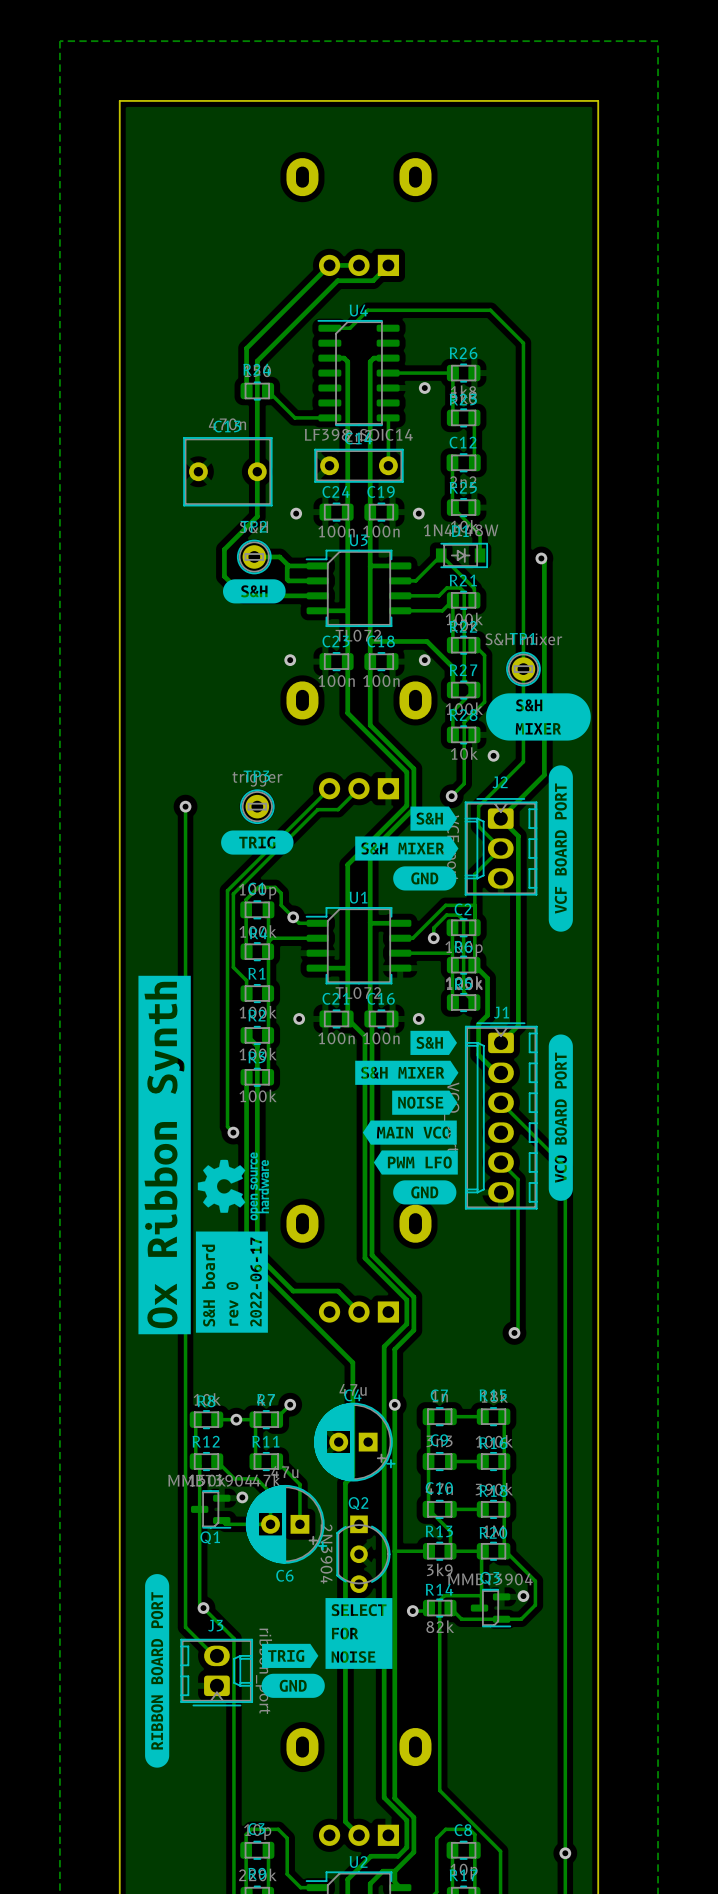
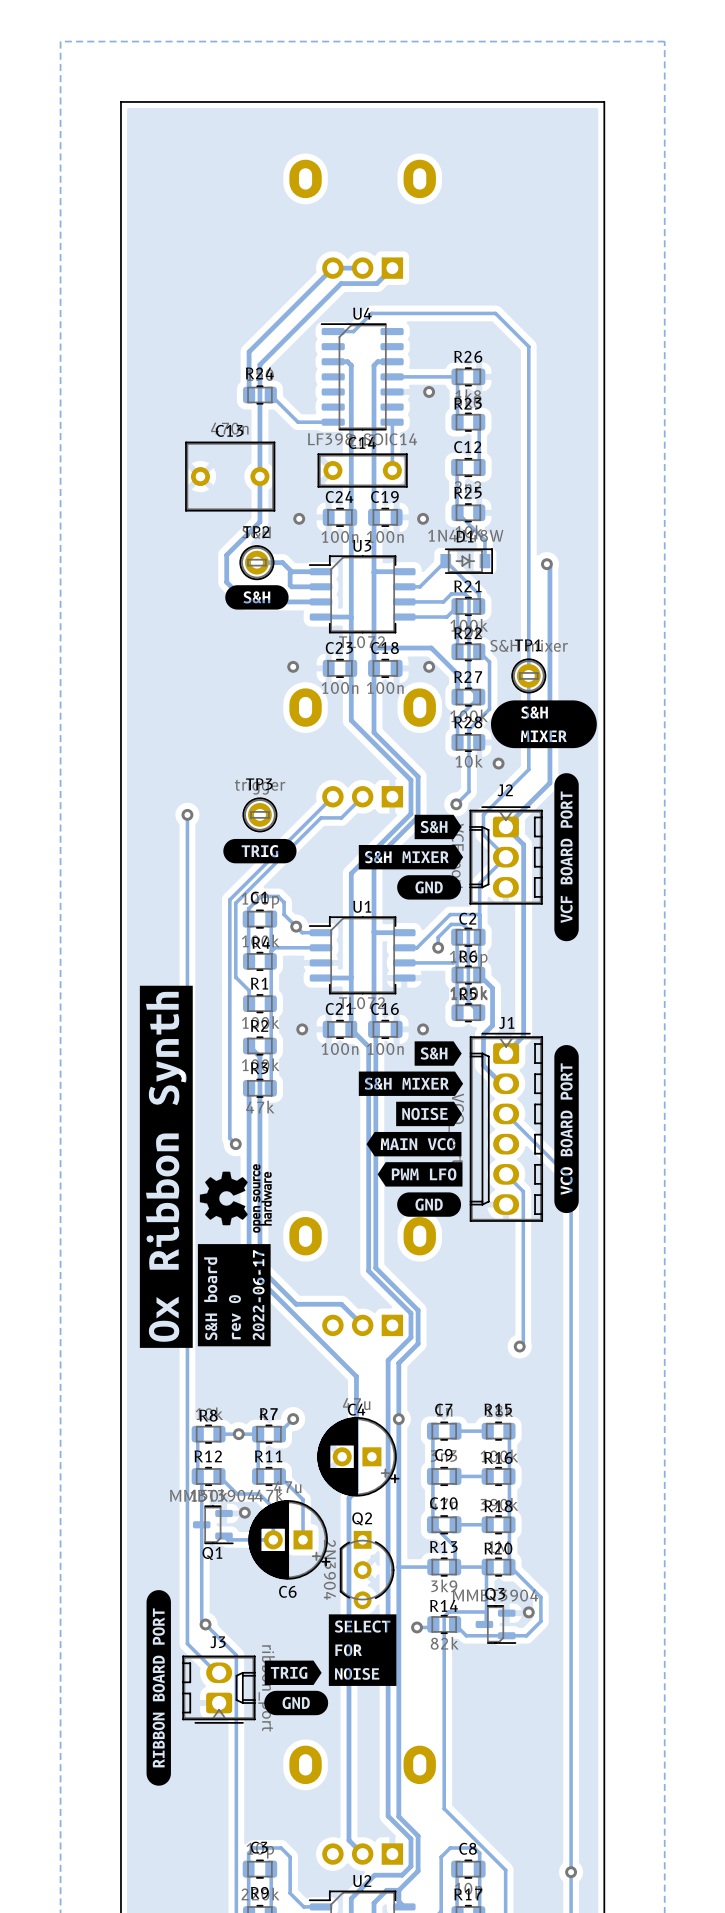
R3 value: 100k (258, 1095) -> 47k (260, 1107)

